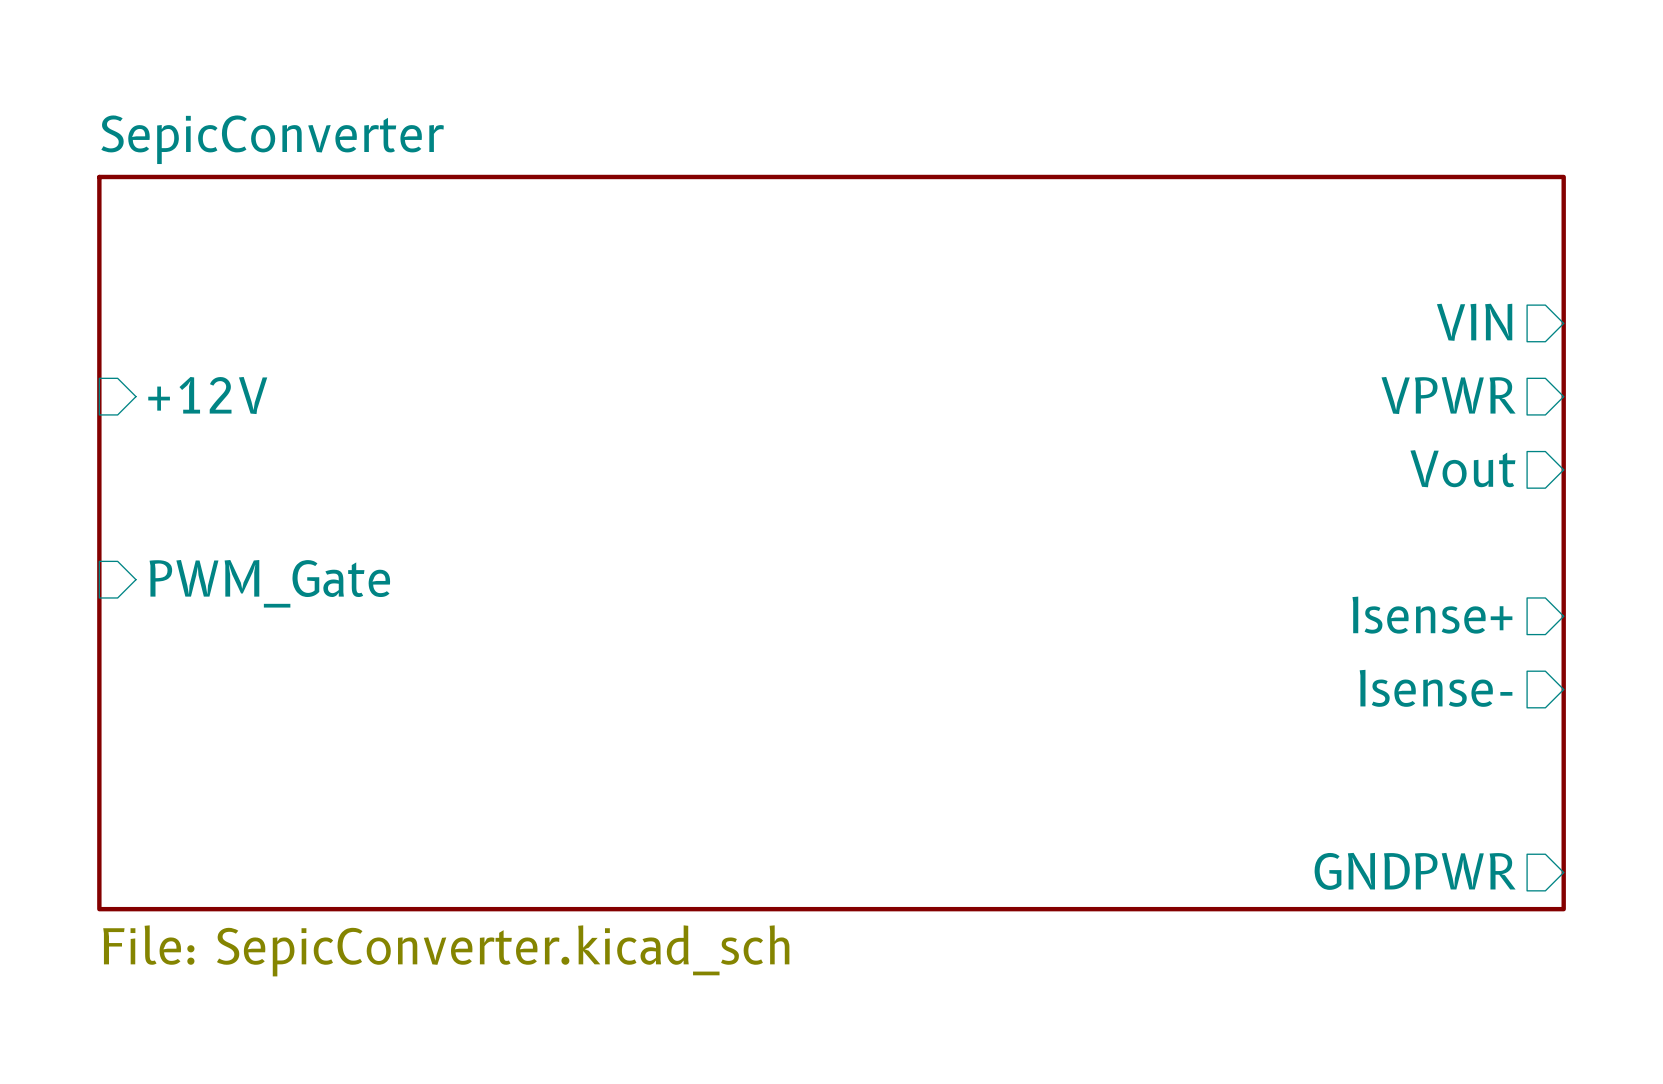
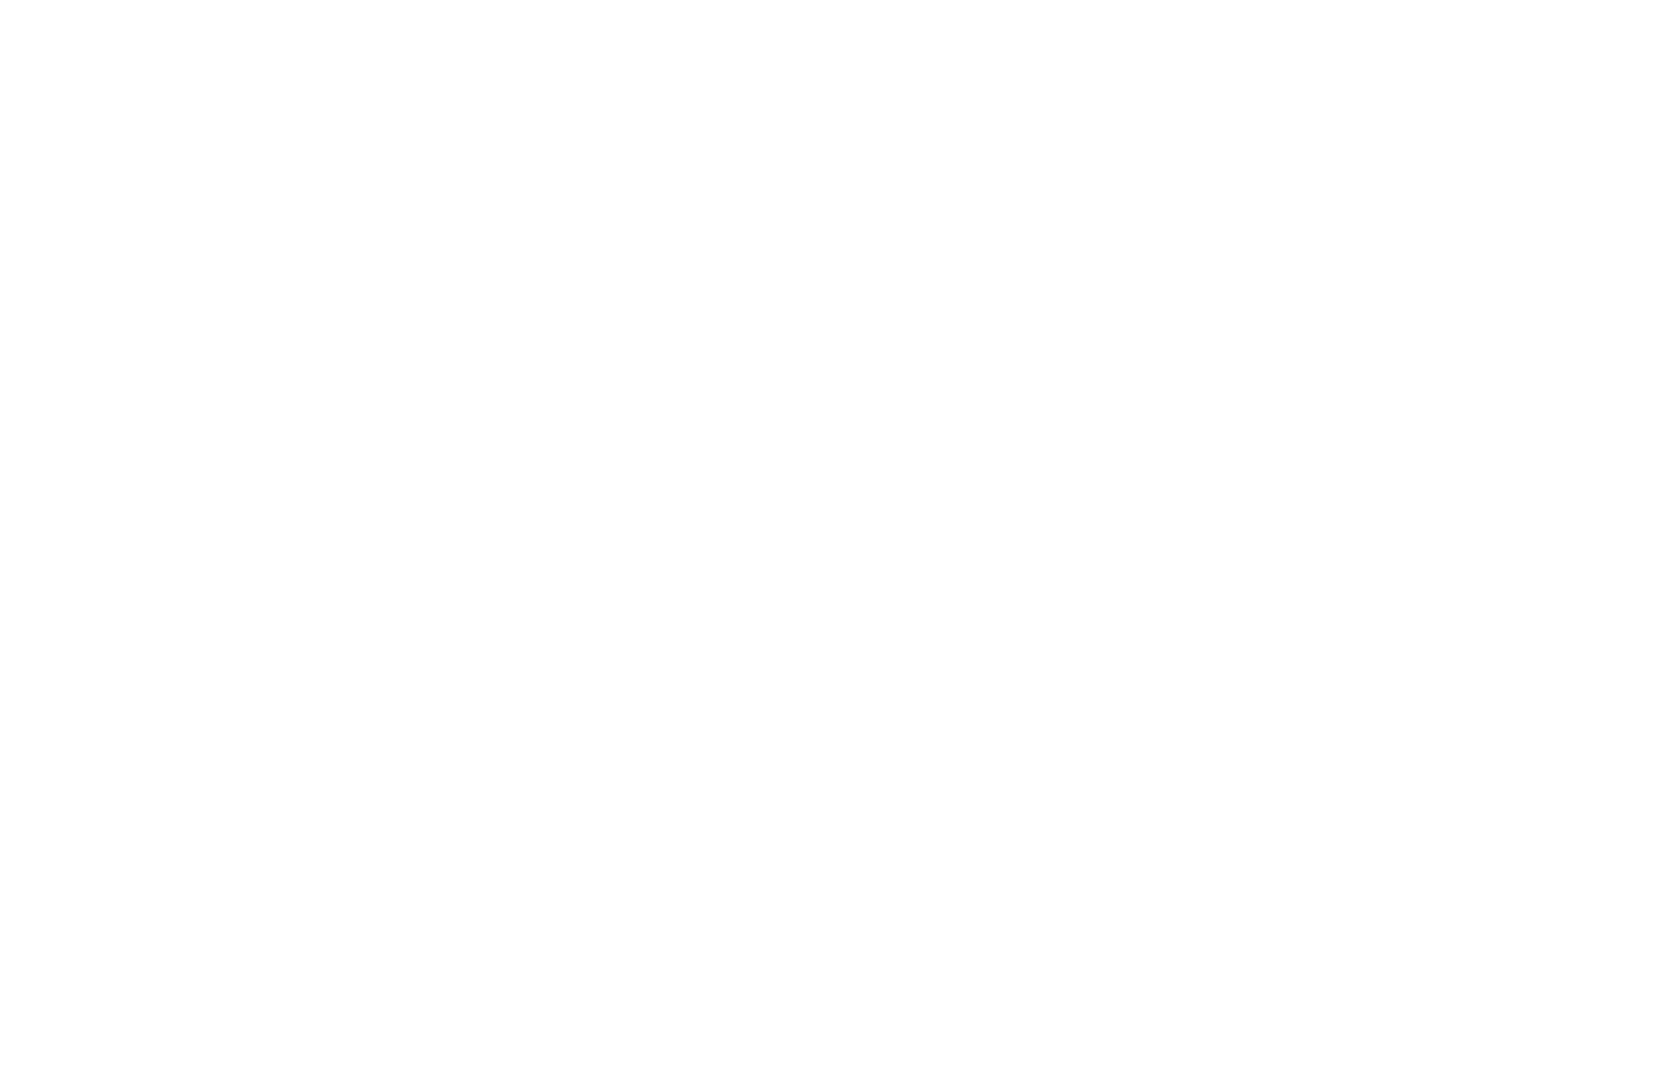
sheet pin: VIN (1474, 322) -> none
sheet pin: +12V (207, 395) -> none
sheet pin: VPWR (1448, 395) -> none
sheet pin: Vout (1462, 468) -> none
sheet SepicConverter: File: SepicConverter.kicad_sch (831, 543) -> none
sheet pin: PWM_Gate (269, 583) -> none
sheet pin: Isense+ (1432, 615) -> none
sheet pin: Isense- (1436, 688) -> none
sheet pin: GNDPWR (1415, 871) -> none

